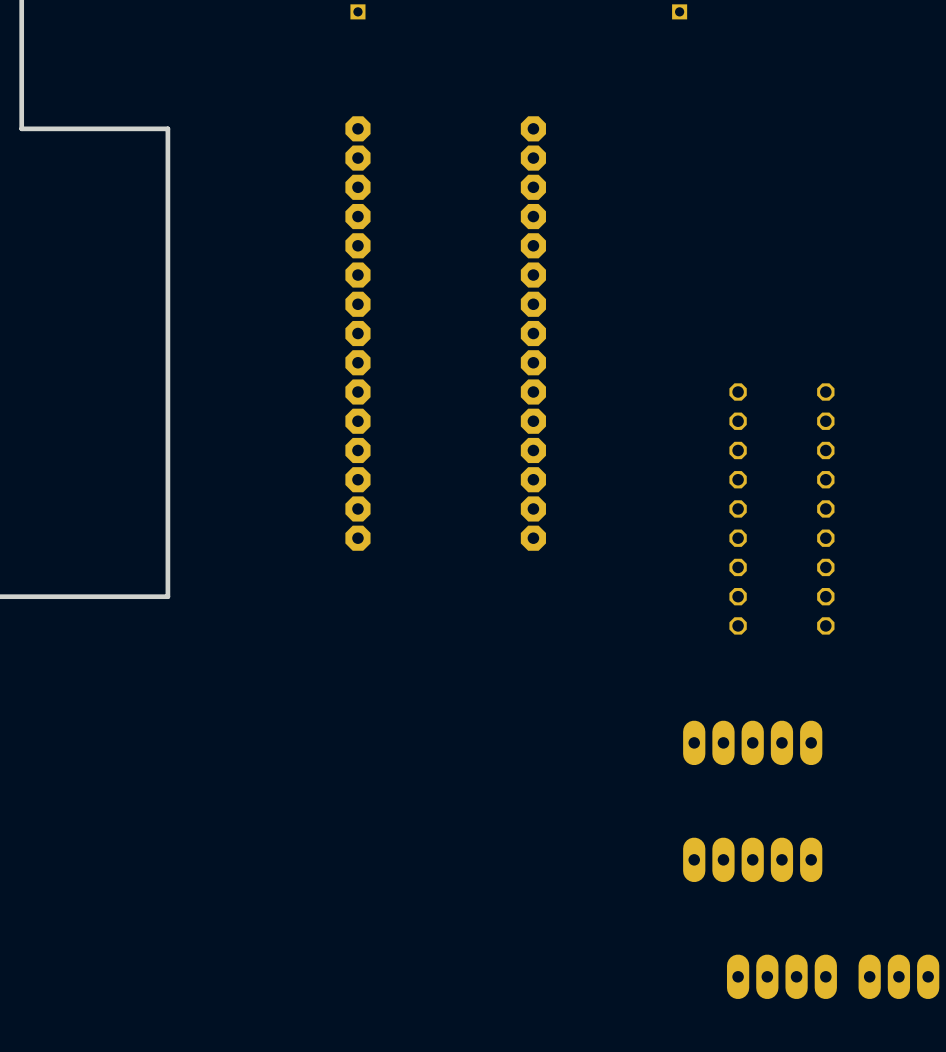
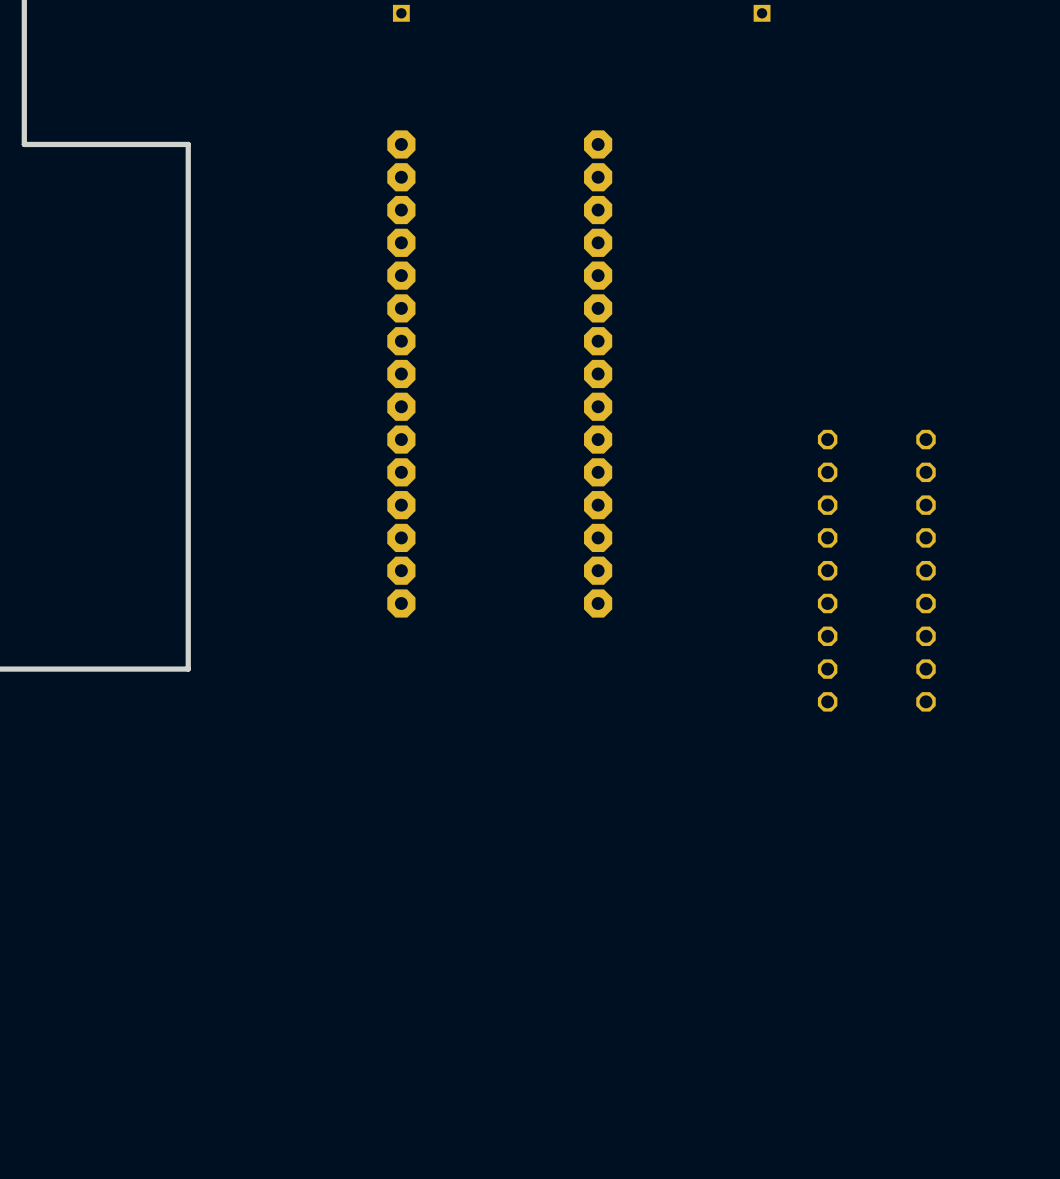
part: (752, 742) -> none
part: (752, 859) -> none
part: (781, 976) -> none
part: (898, 976) -> none

